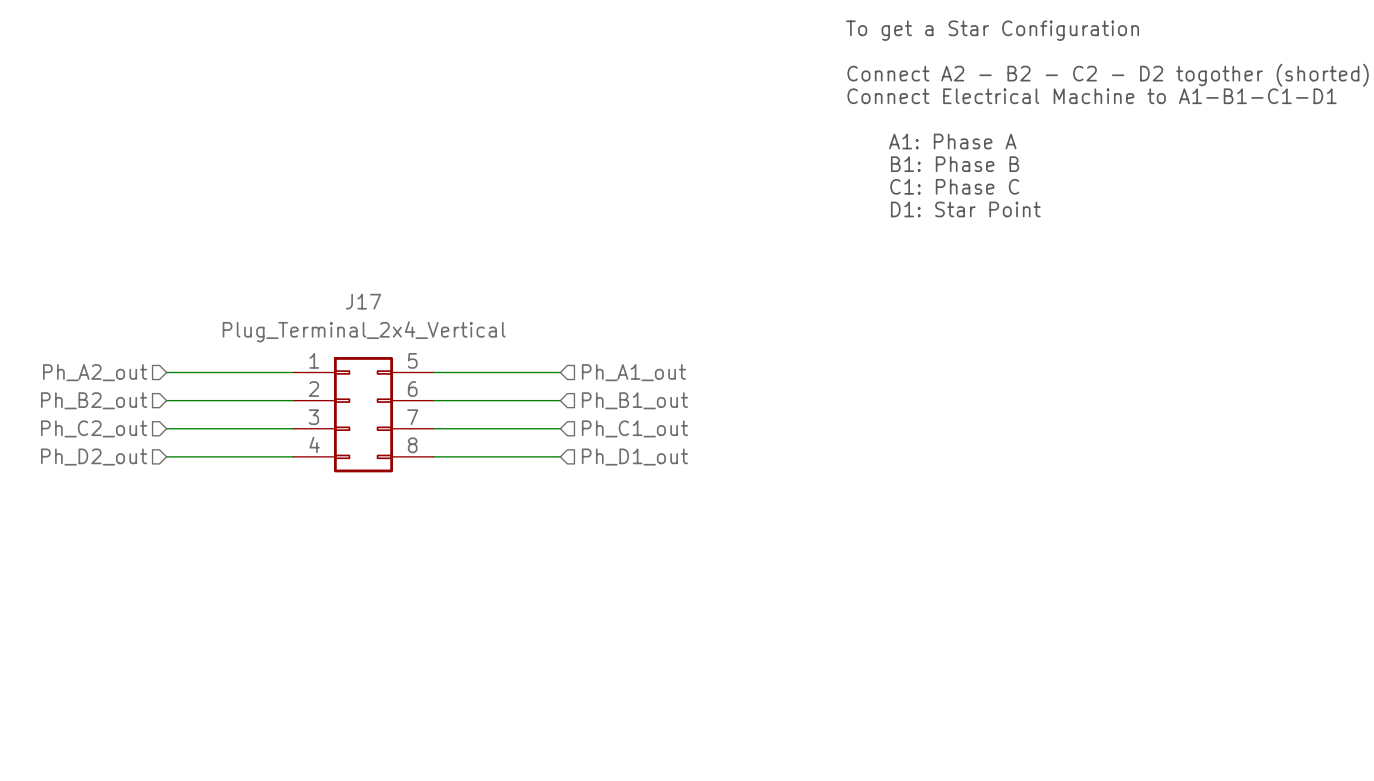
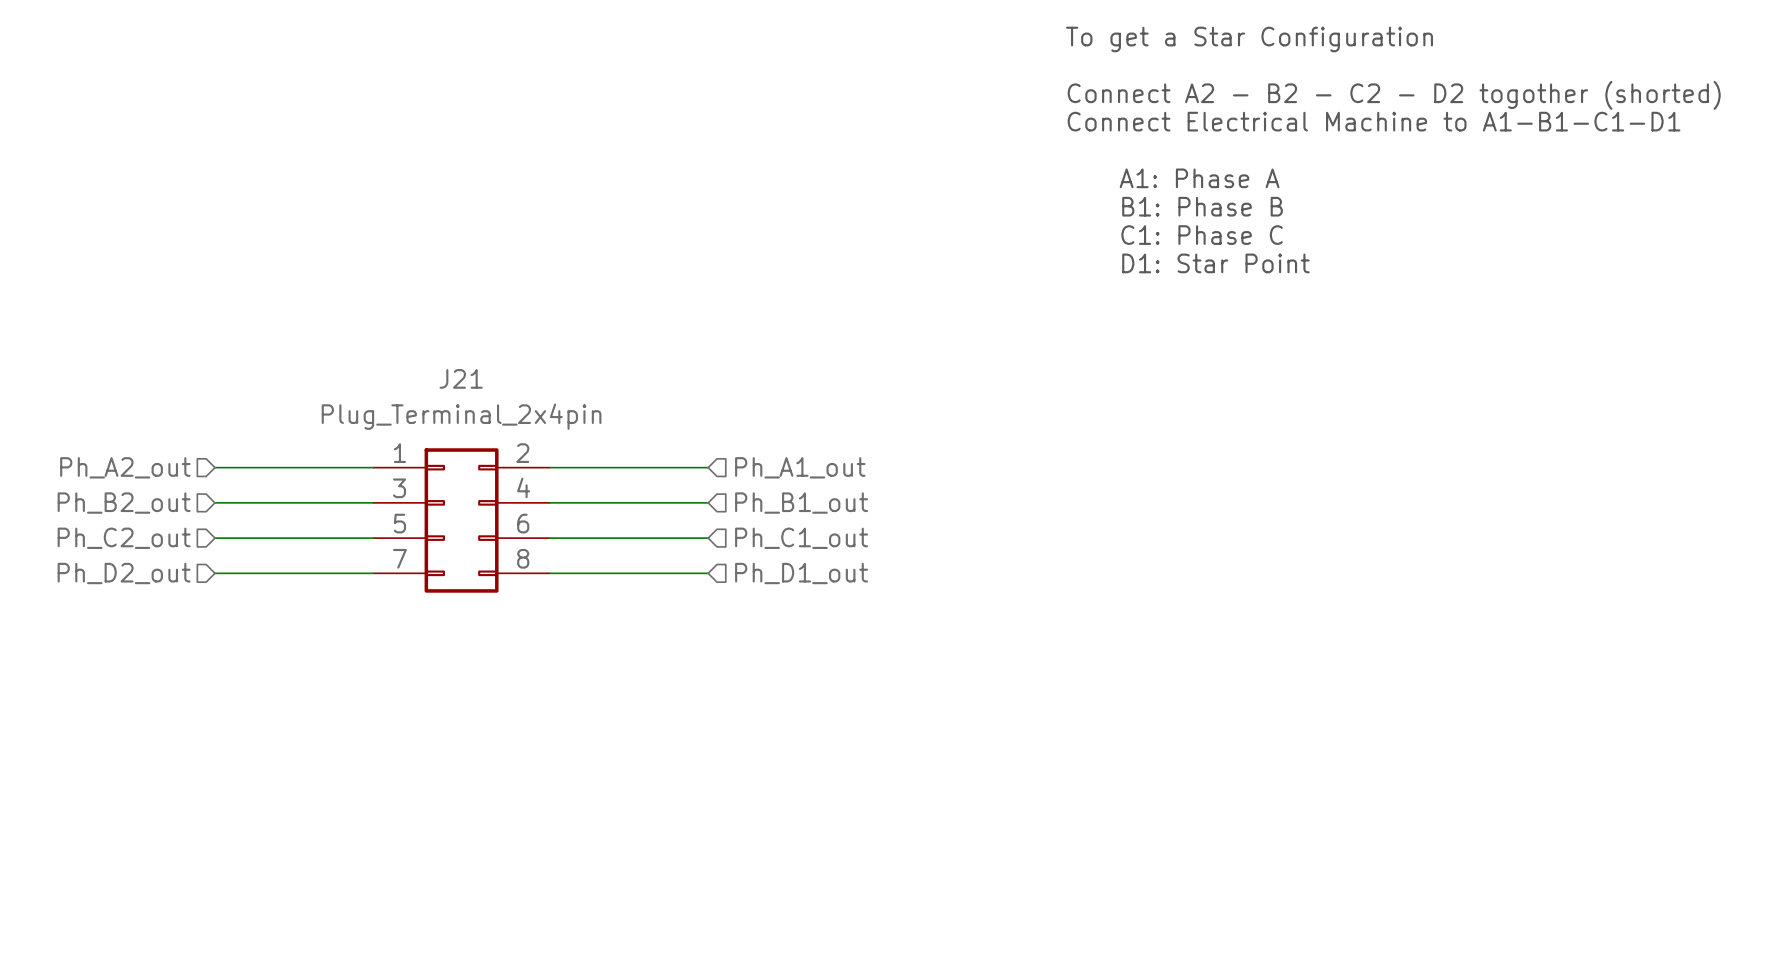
J17 name: J17 (363, 301) -> J21 (461, 378)
J17 value: Plug_Terminal_2x4_Vertical (364, 331) -> Plug_Terminal_2x4pin (461, 416)
J17 pin number: 5 (412, 360) -> 2 (522, 453)
J17 pin number: 2 (313, 389) -> 3 (399, 488)
J17 pin number: 6 (412, 389) -> 4 (523, 487)
J17 pin number: 3 (313, 417) -> 5 (399, 523)
J17 pin number: 7 (412, 417) -> 6 (523, 523)
J17 pin number: 4 (314, 444) -> 7 (399, 558)

